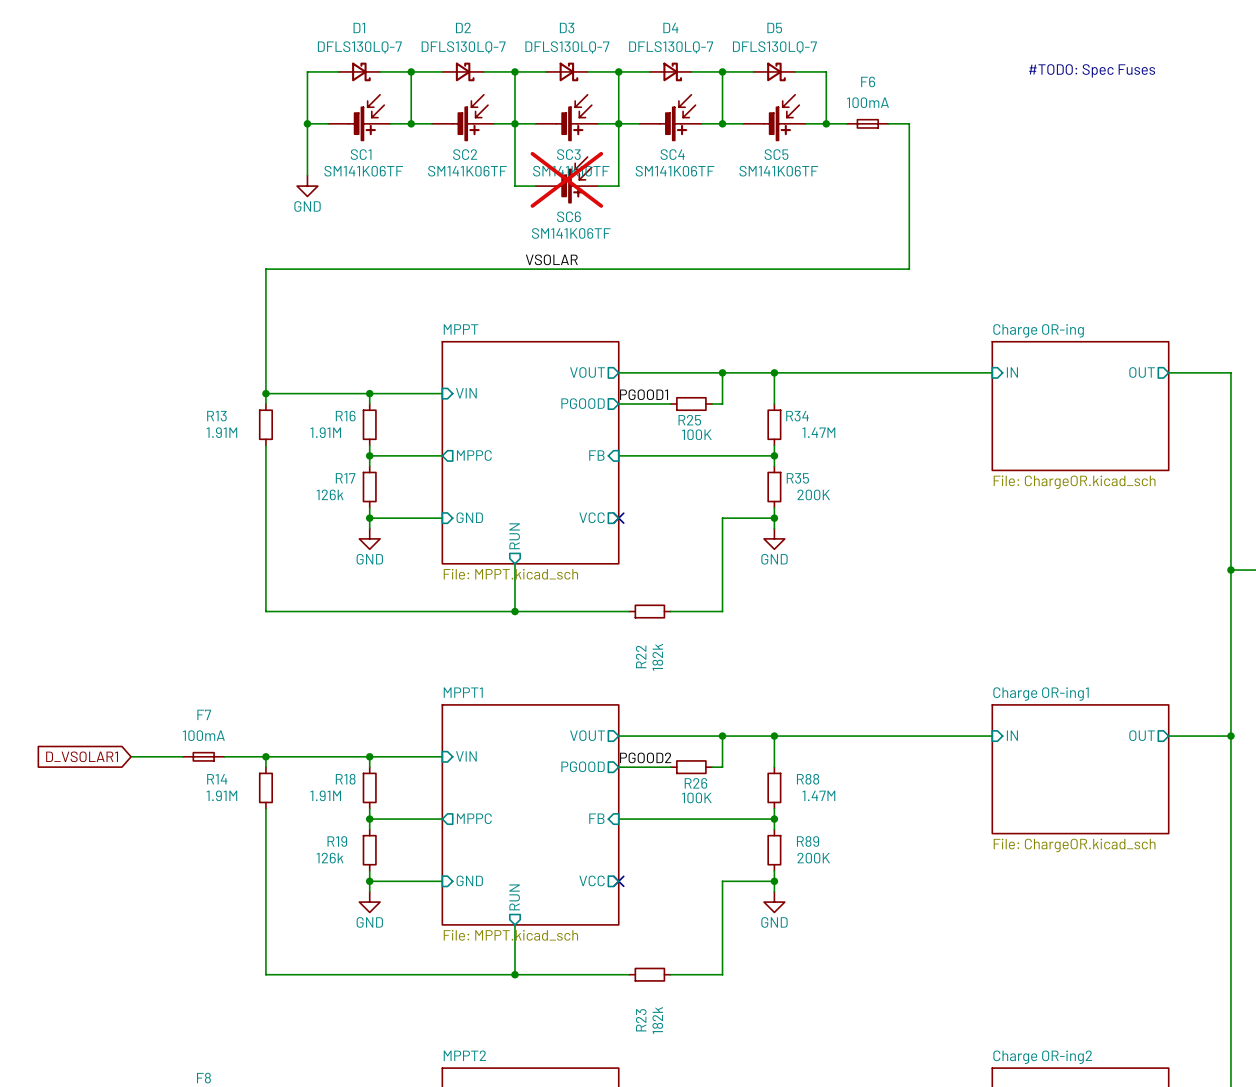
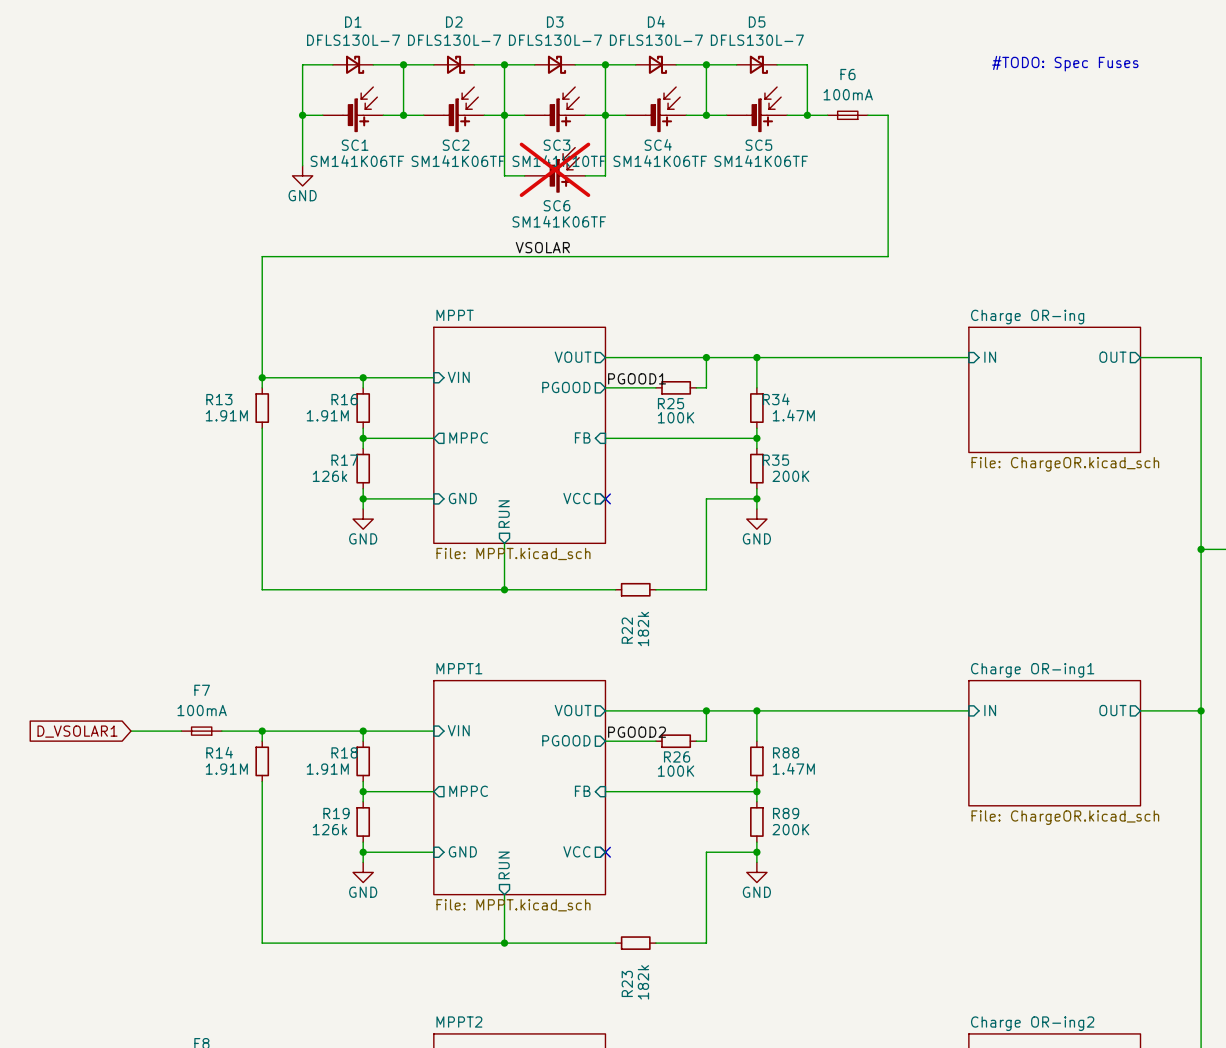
D1 value: DFLS130LQ-7 (359, 47) -> DFLS130L-7 (353, 40)
D2 value: DFLS130LQ-7 (463, 47) -> DFLS130L-7 (454, 40)
D3 value: DFLS130LQ-7 (567, 47) -> DFLS130L-7 (555, 40)
D4 value: DFLS130LQ-7 (671, 47) -> DFLS130L-7 (656, 40)
D5 value: DFLS130LQ-7 (774, 47) -> DFLS130L-7 (757, 40)

